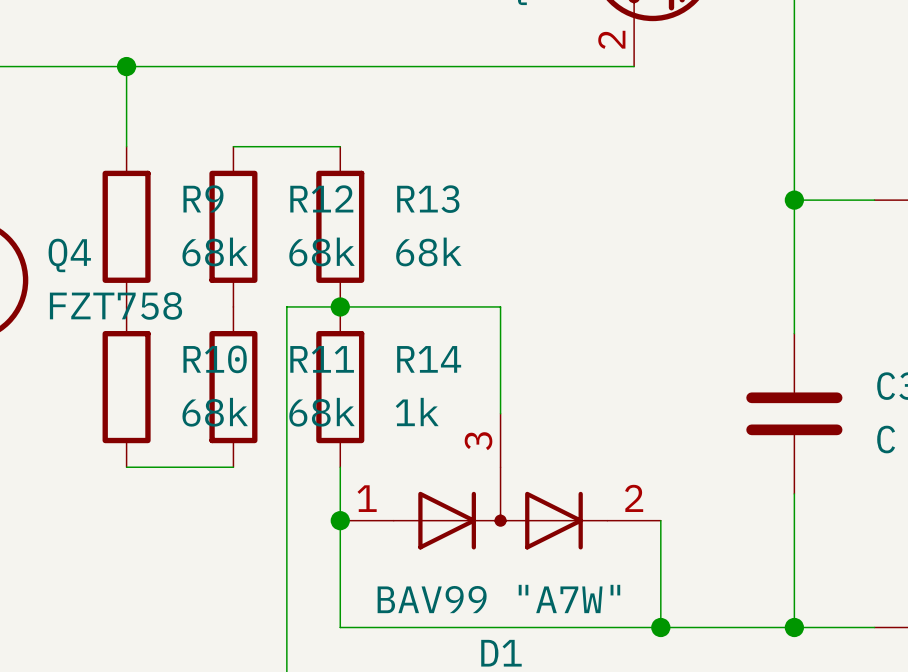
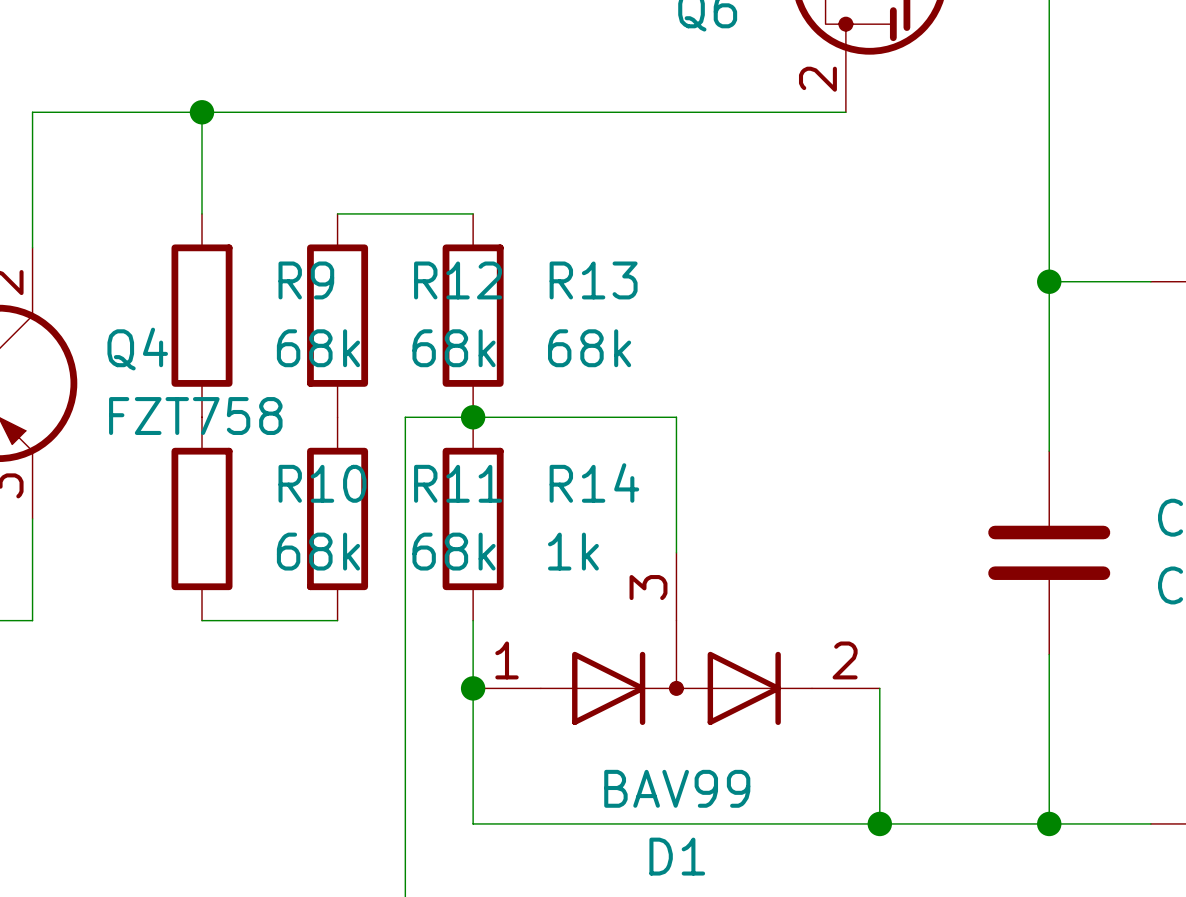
D1 value: BAV99 "A7W" (498, 598) -> BAV99 (677, 788)

